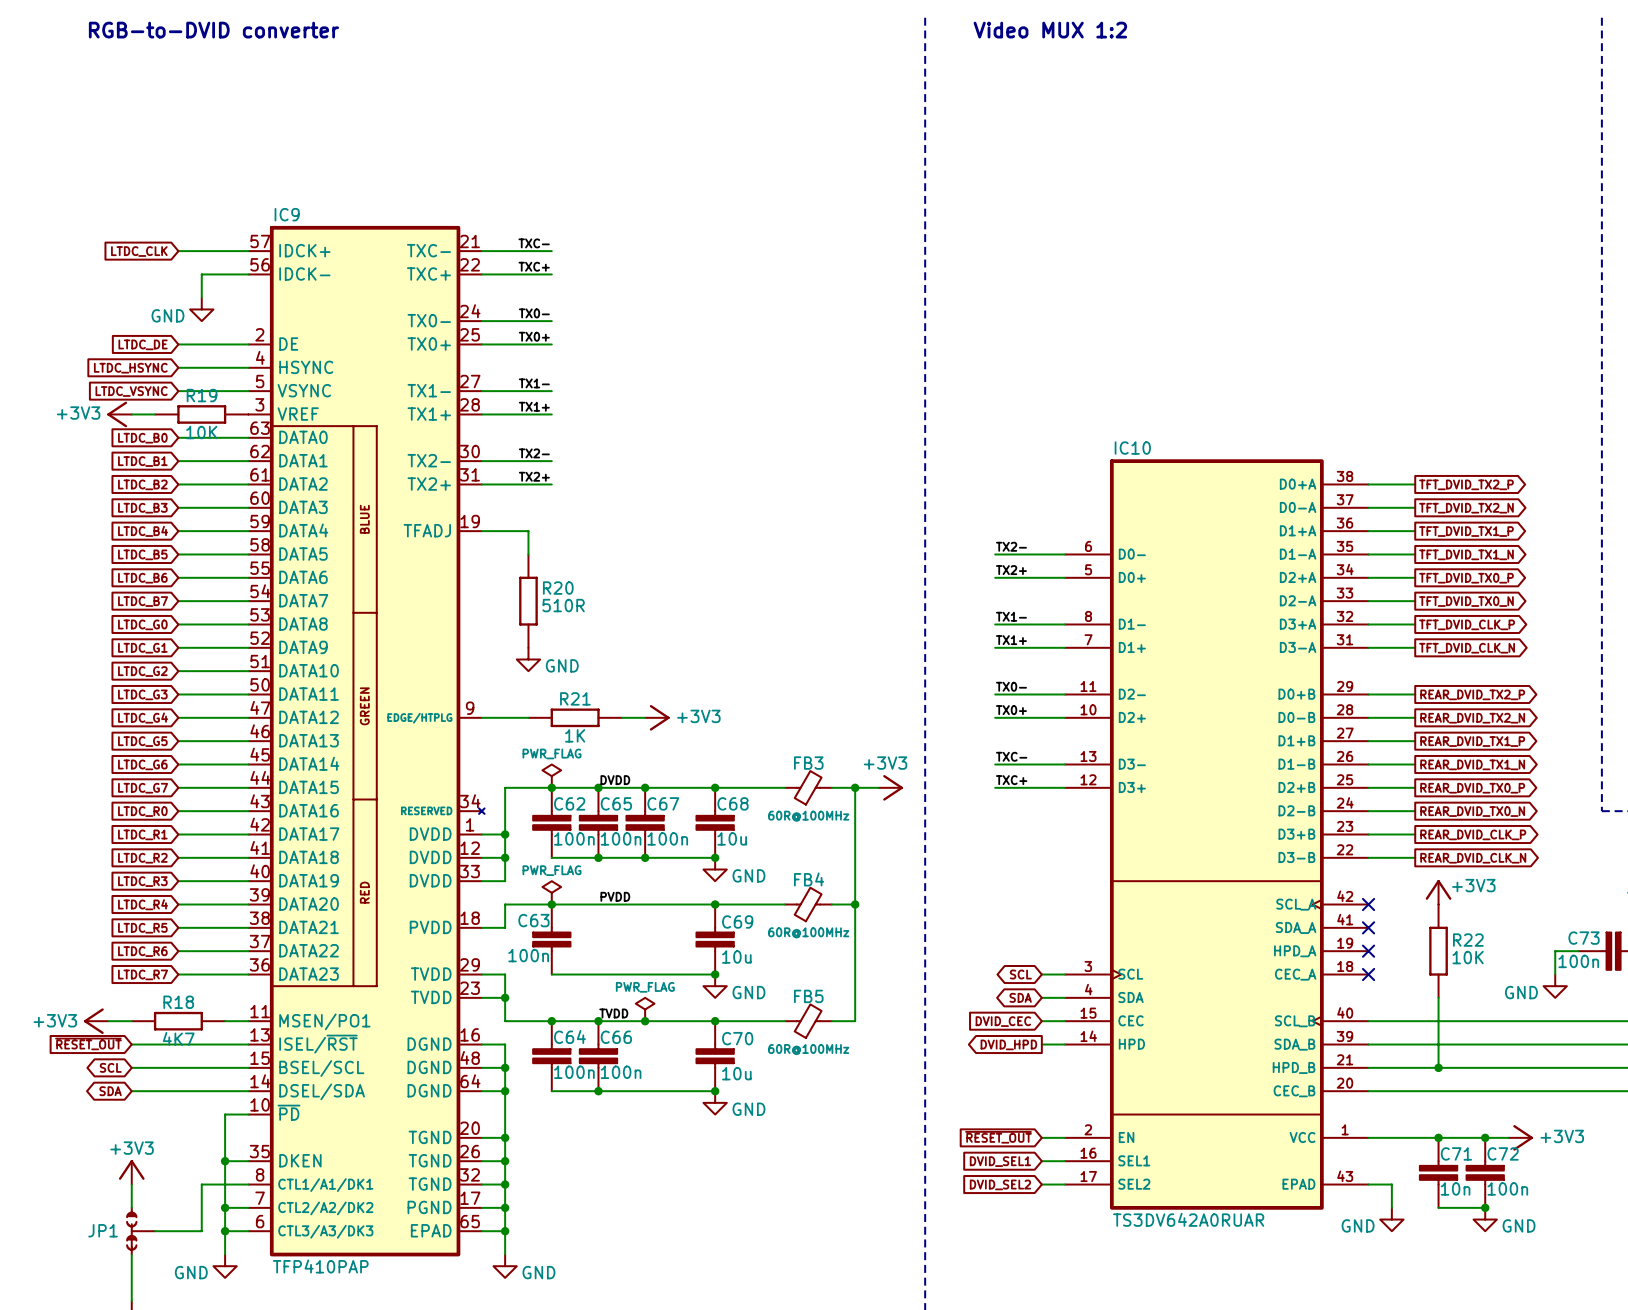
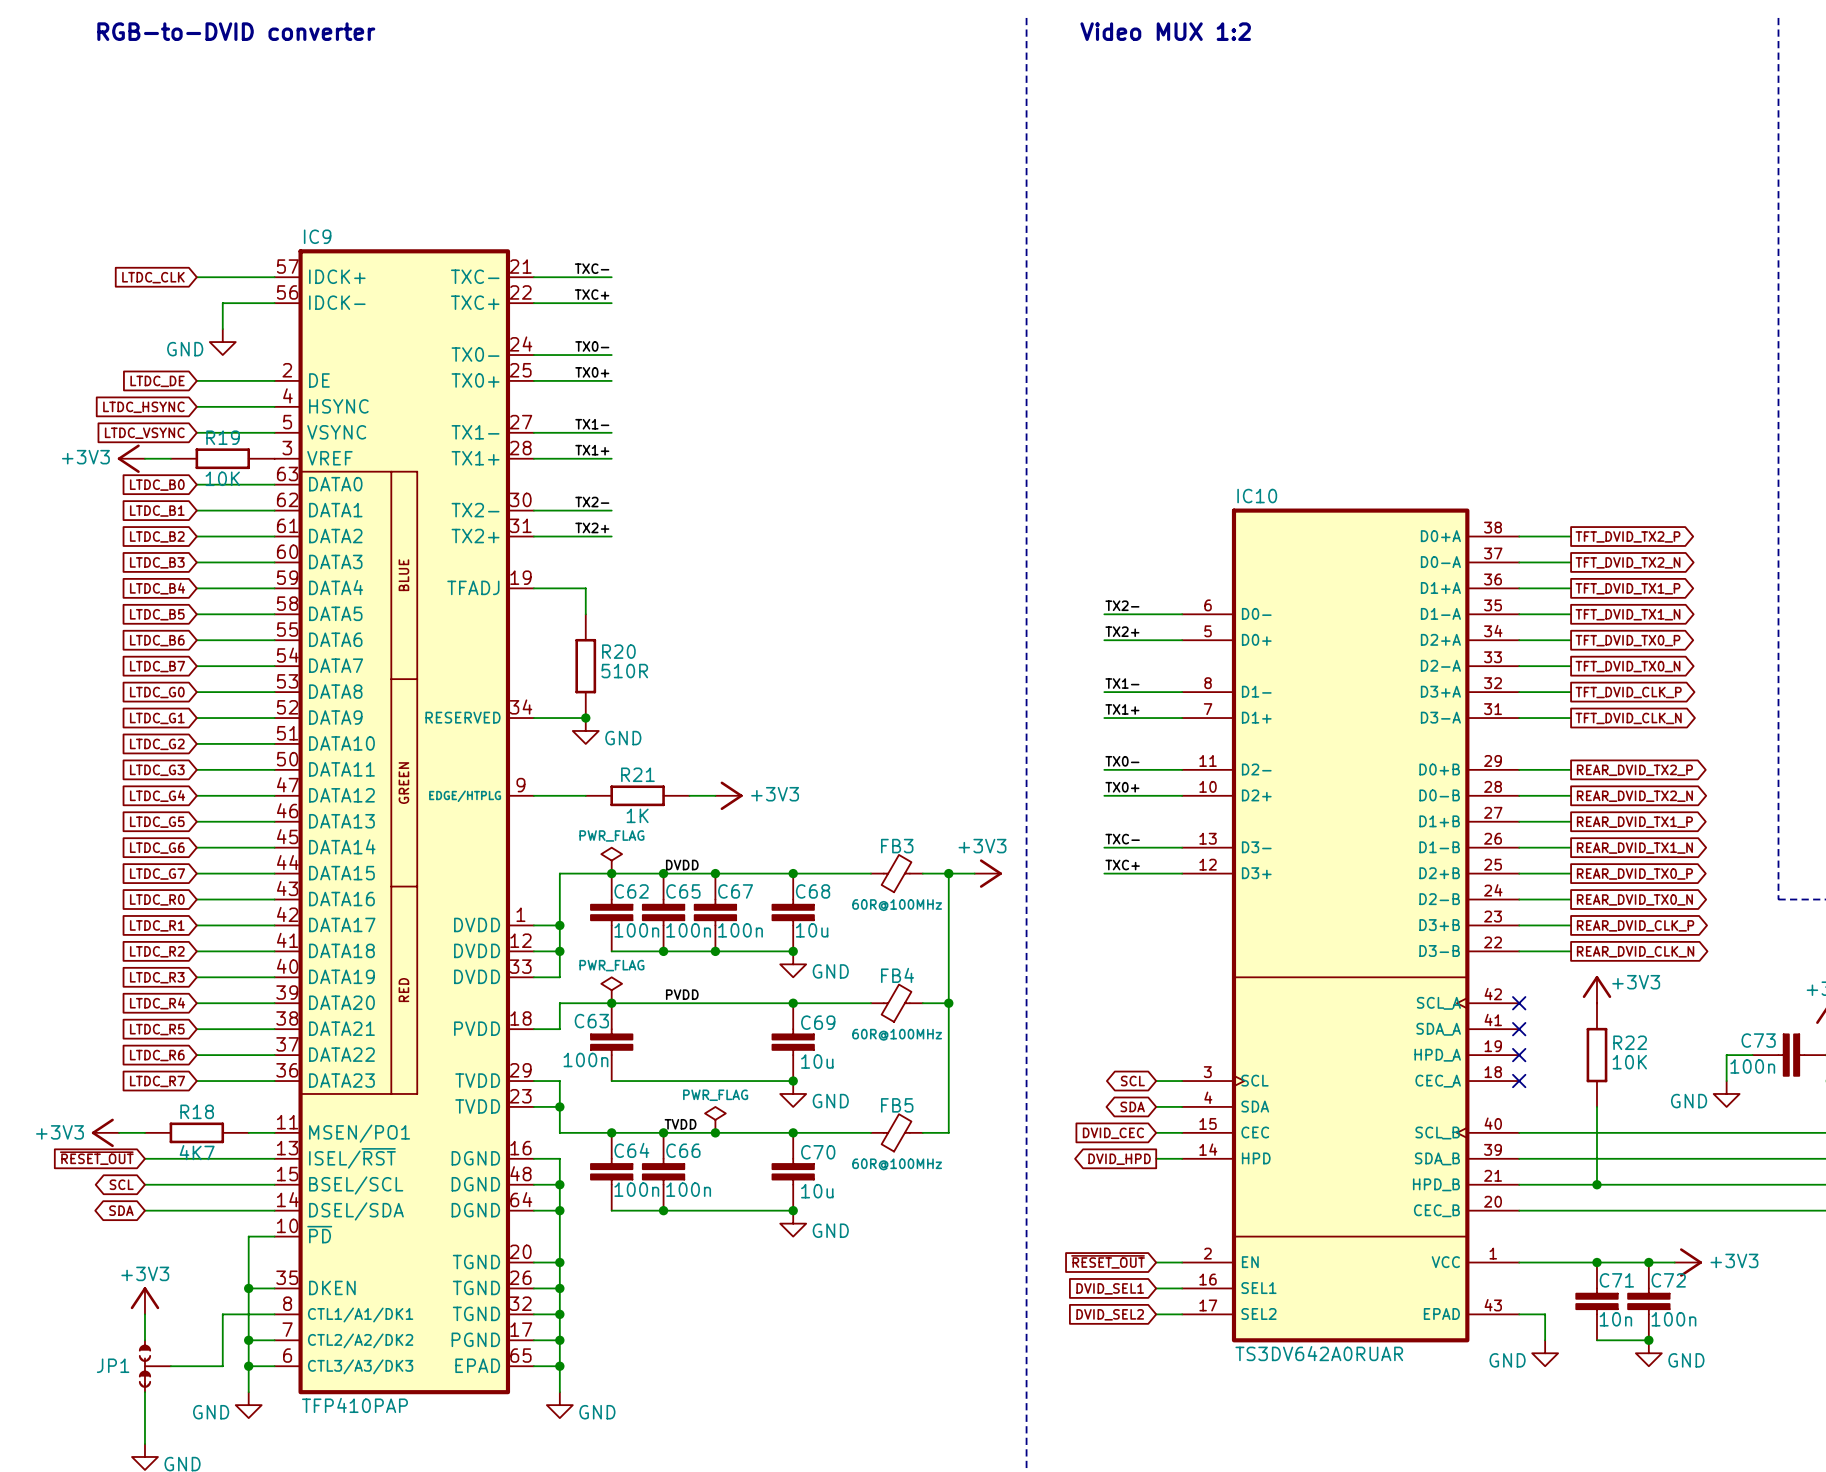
IC9 symbol: [248, 225, 485, 1257] -> [274, 249, 534, 1395]
wire: none -> (533, 718) (585, 718)
junction: none -> (585, 718)

